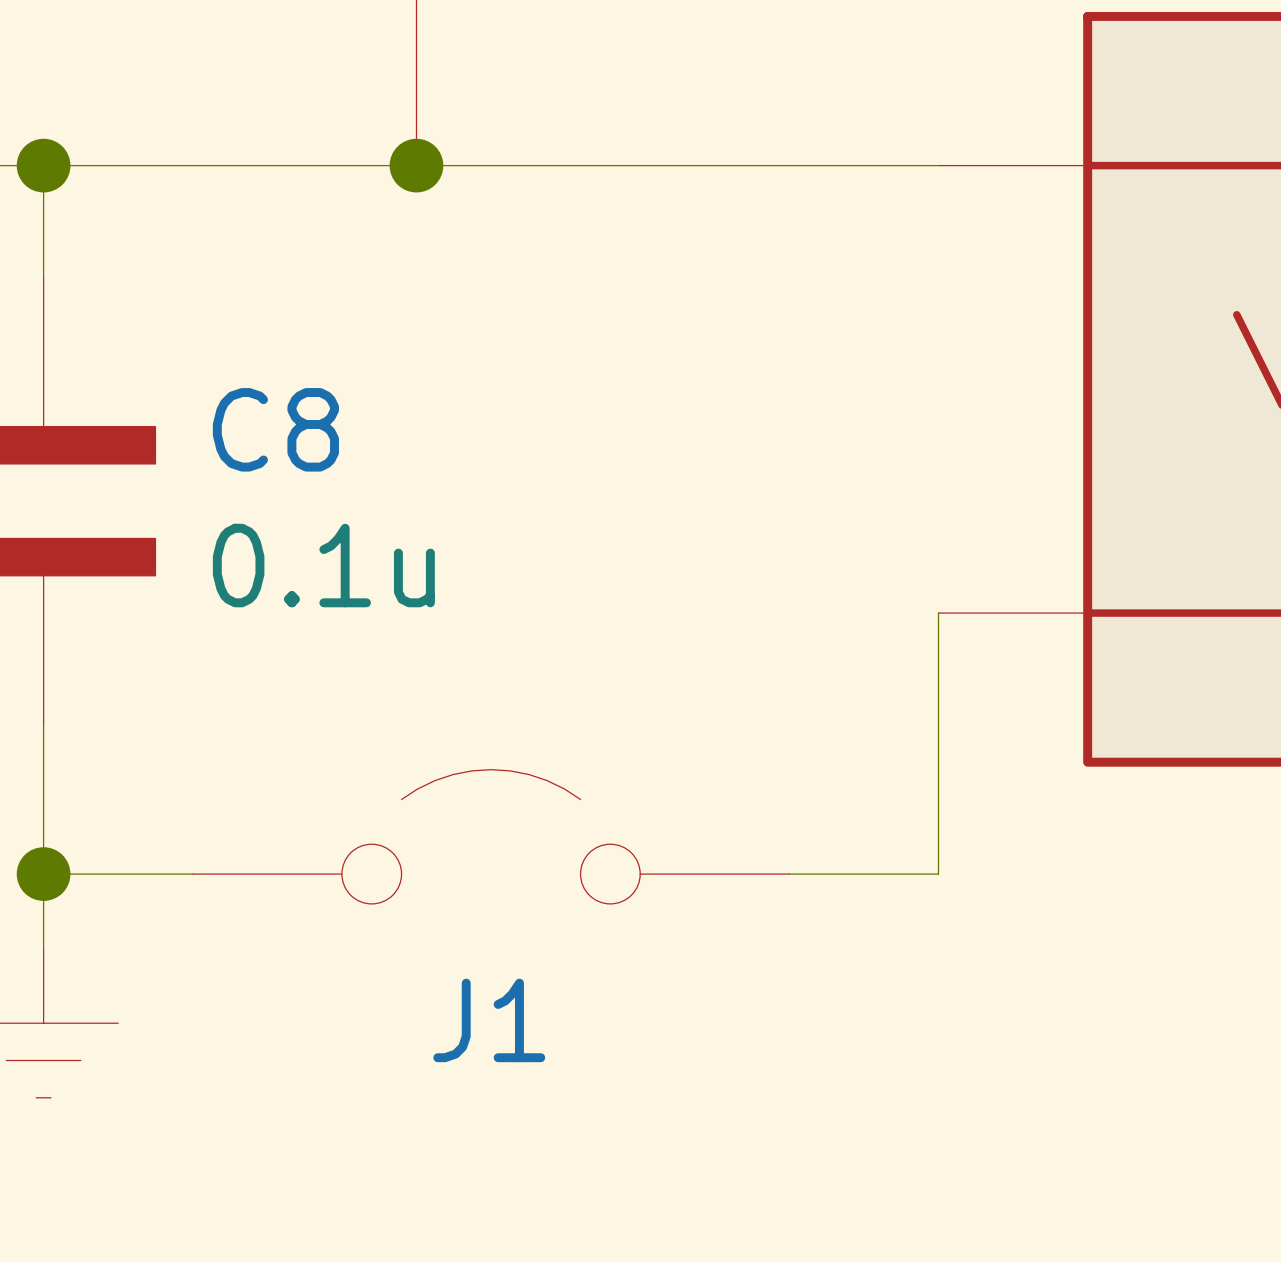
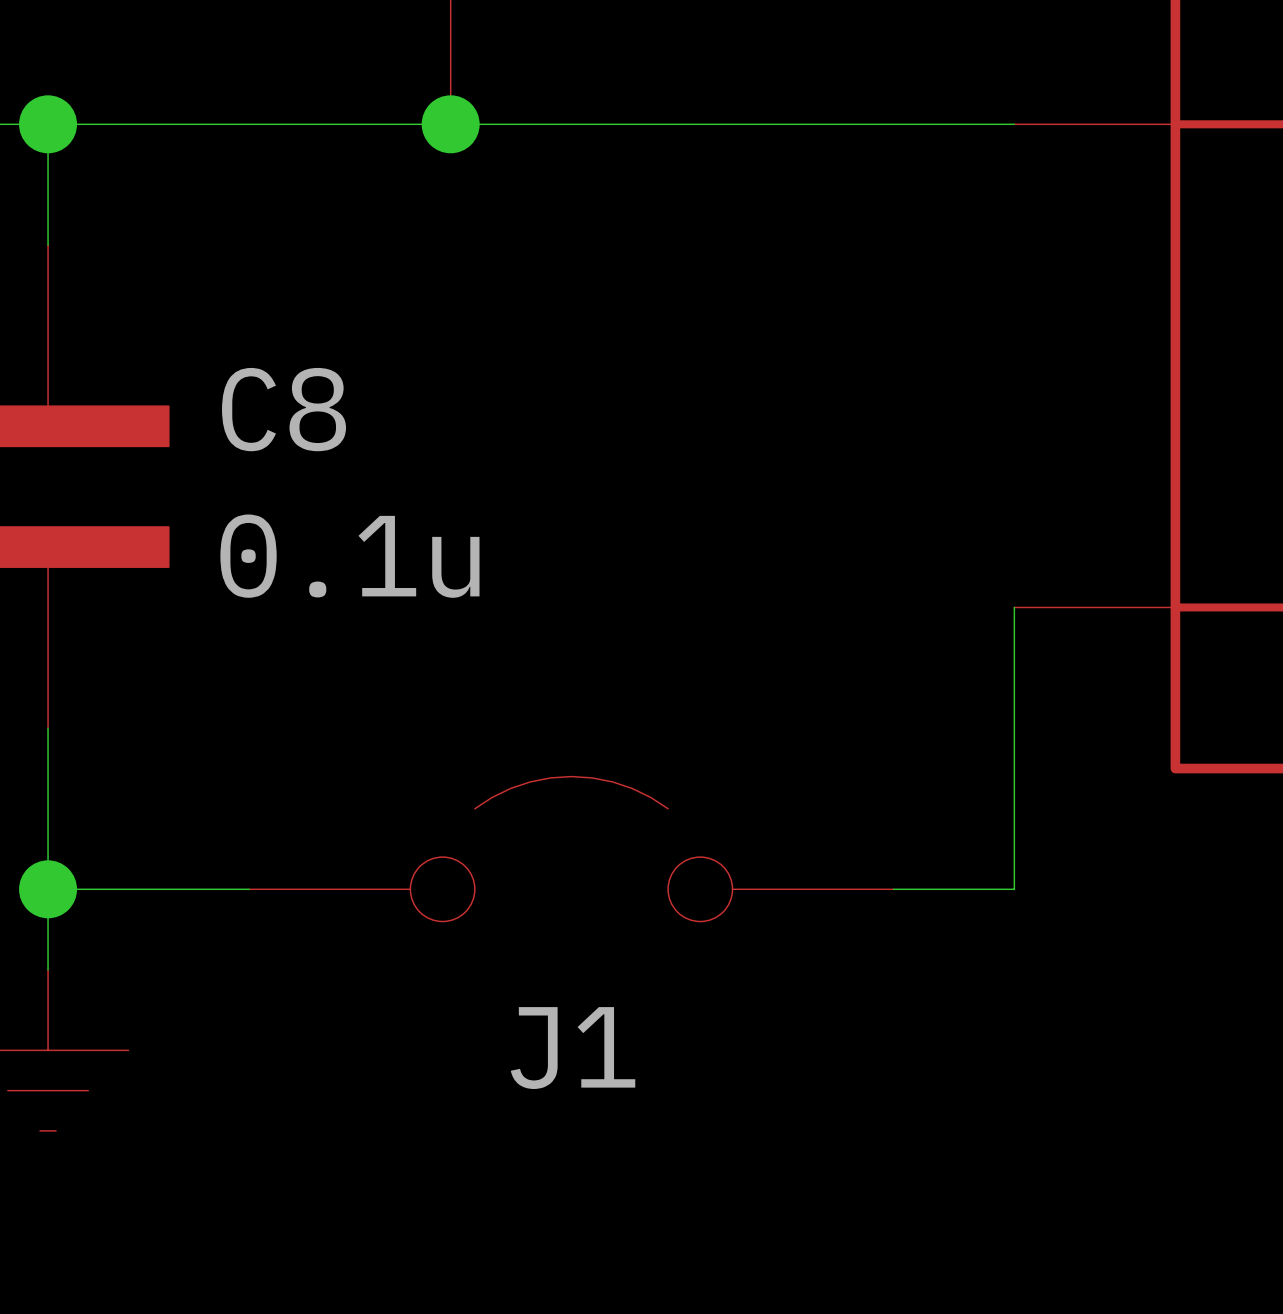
J1 position: (491, 836) -> (571, 849)

